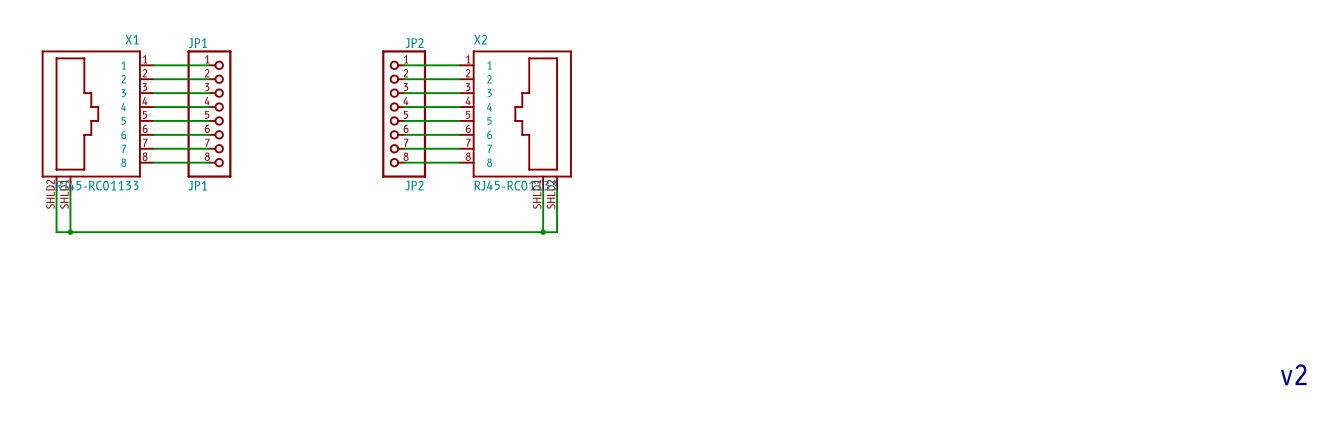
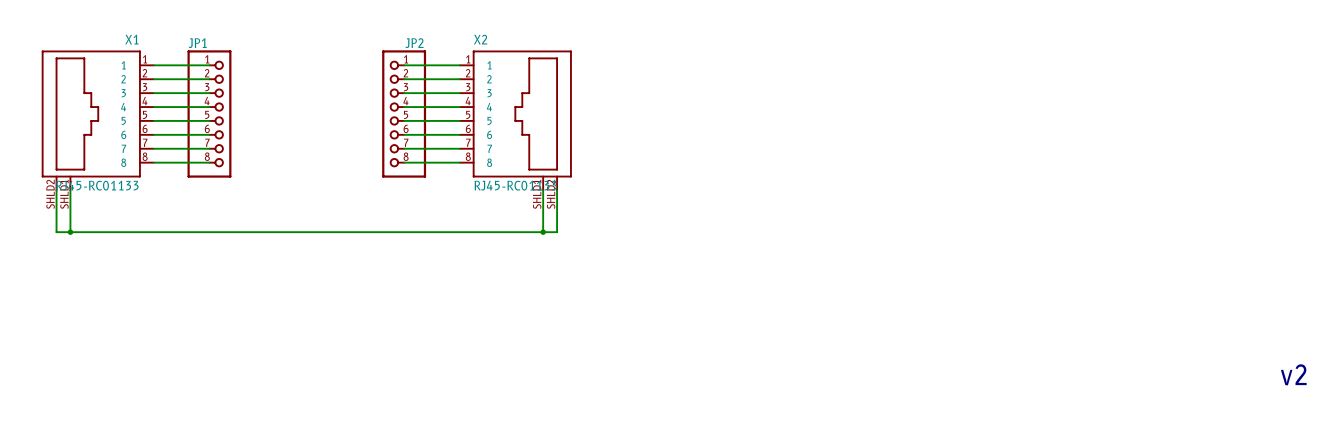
JP1 value: JP1 (197, 185) -> none
JP2 value: JP2 (414, 185) -> none

